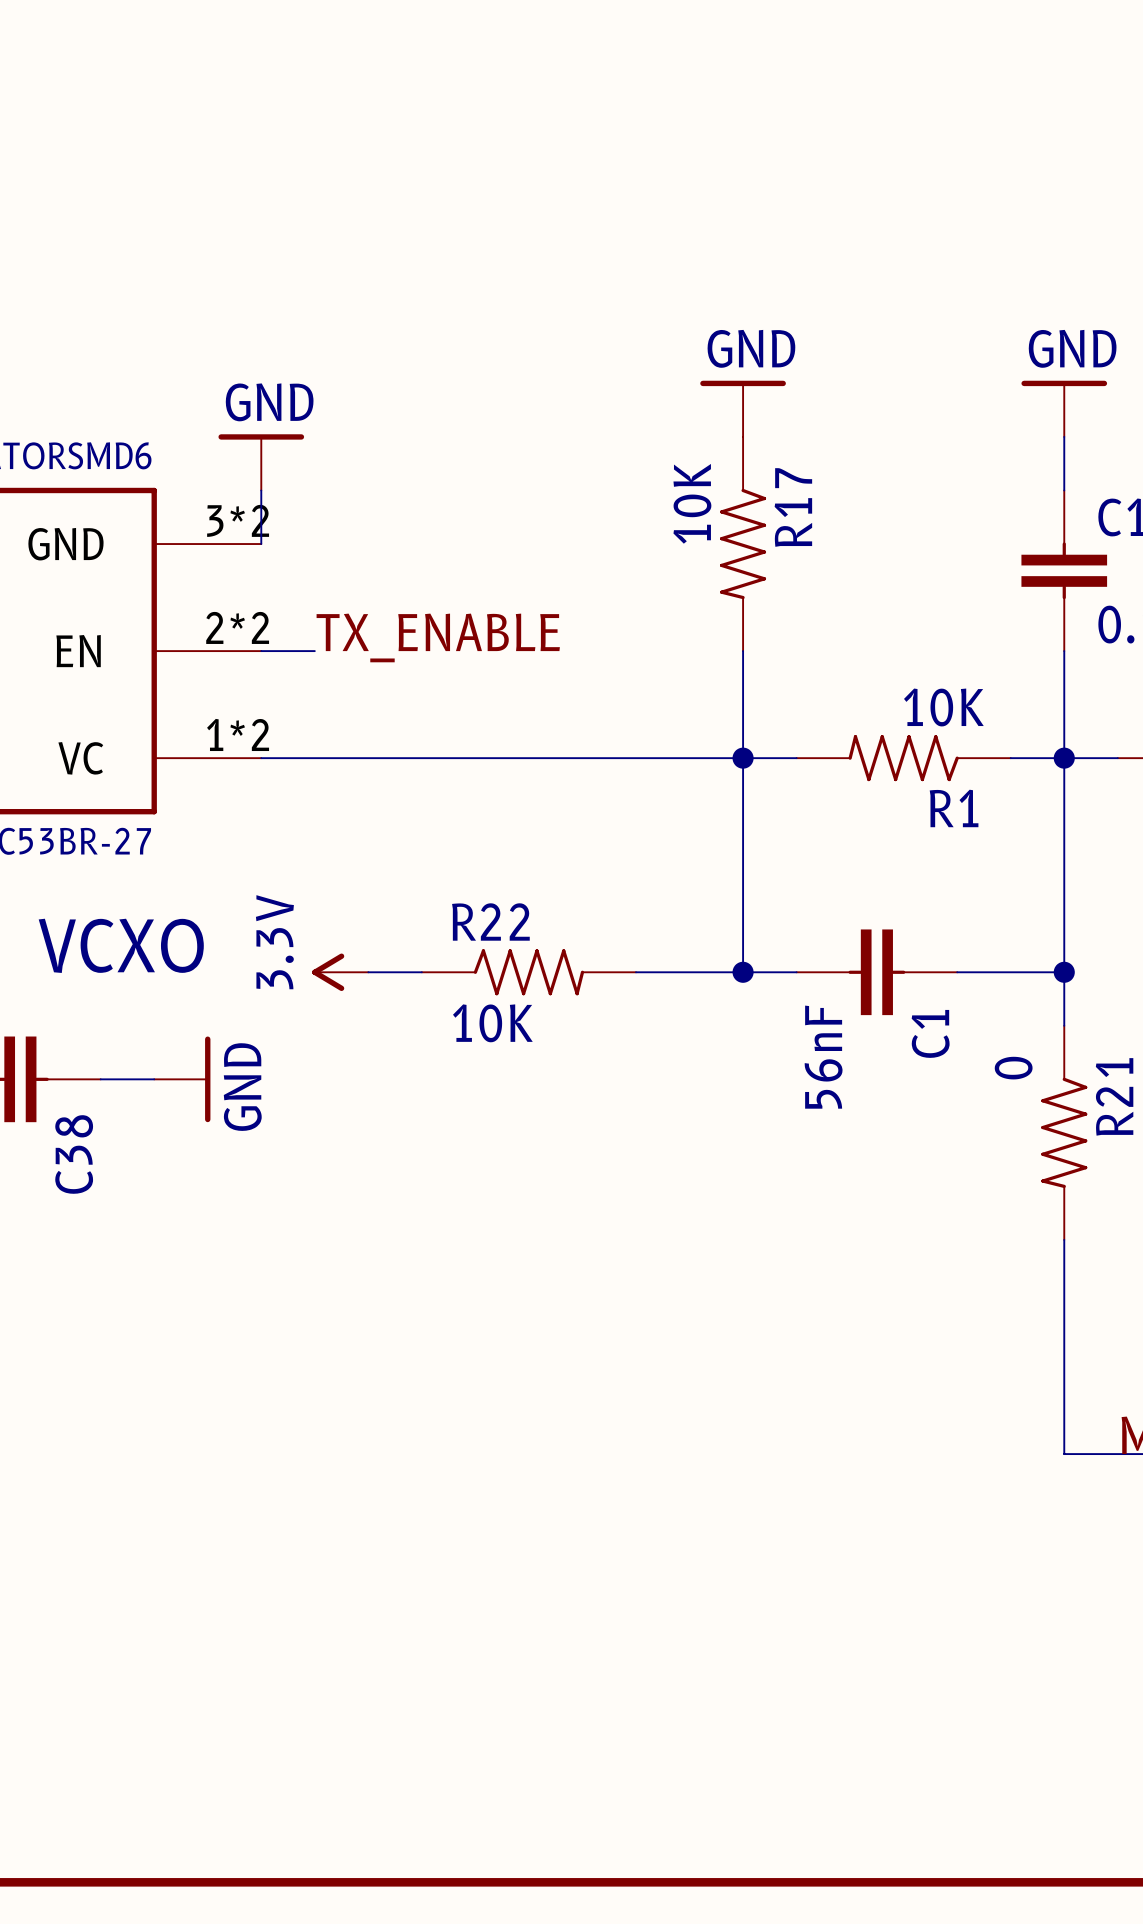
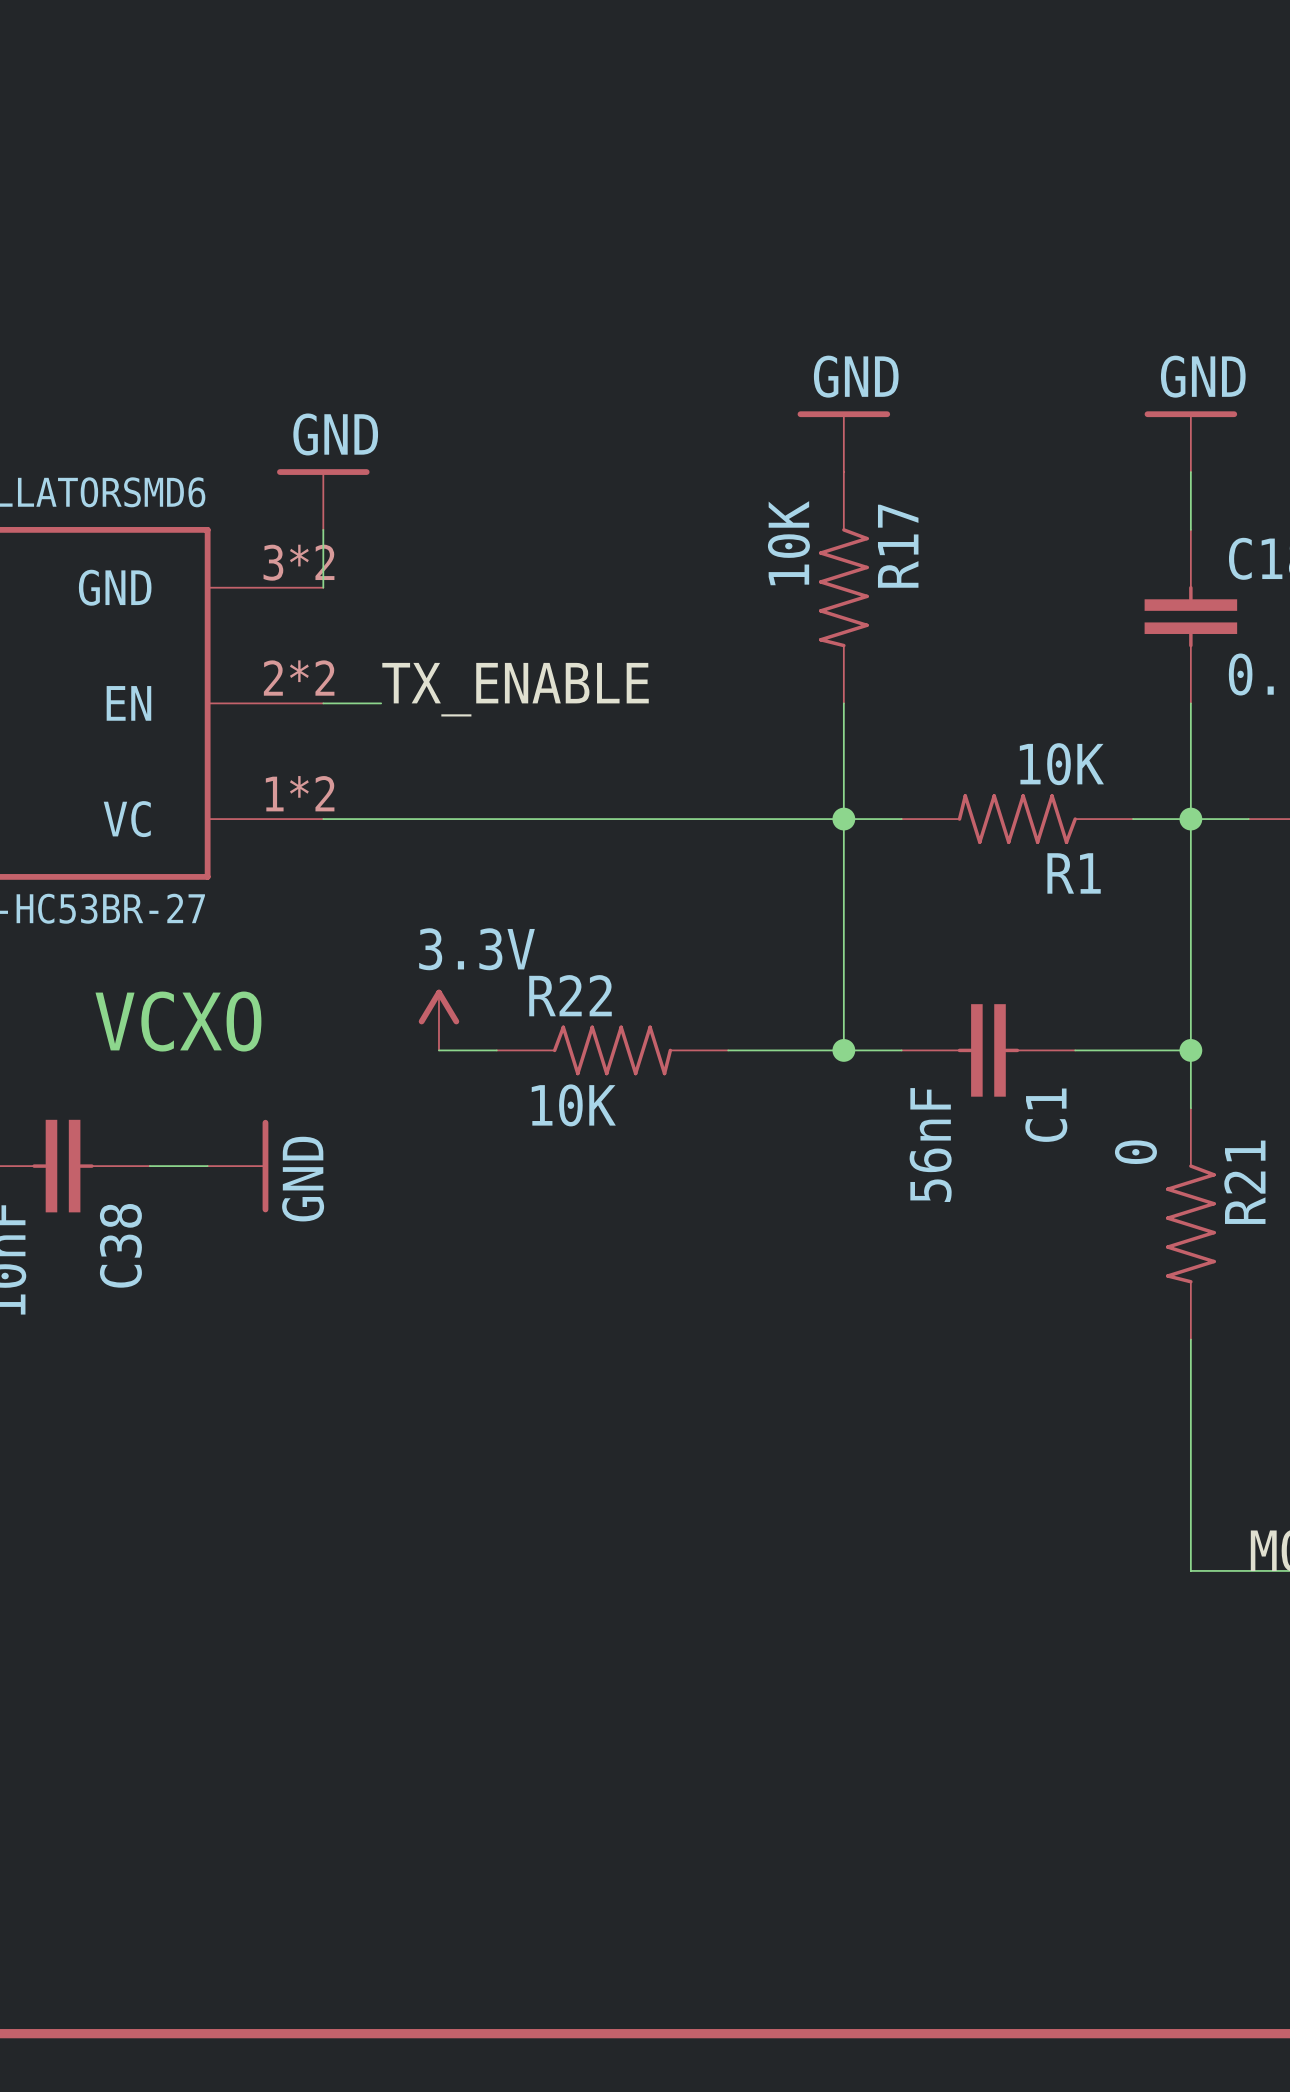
power symbol rotation: 0° (328, 972) -> 90° clockwise (438, 1007)
power symbol position: 3.3V (340, 972) -> 3.3V (438, 1020)

